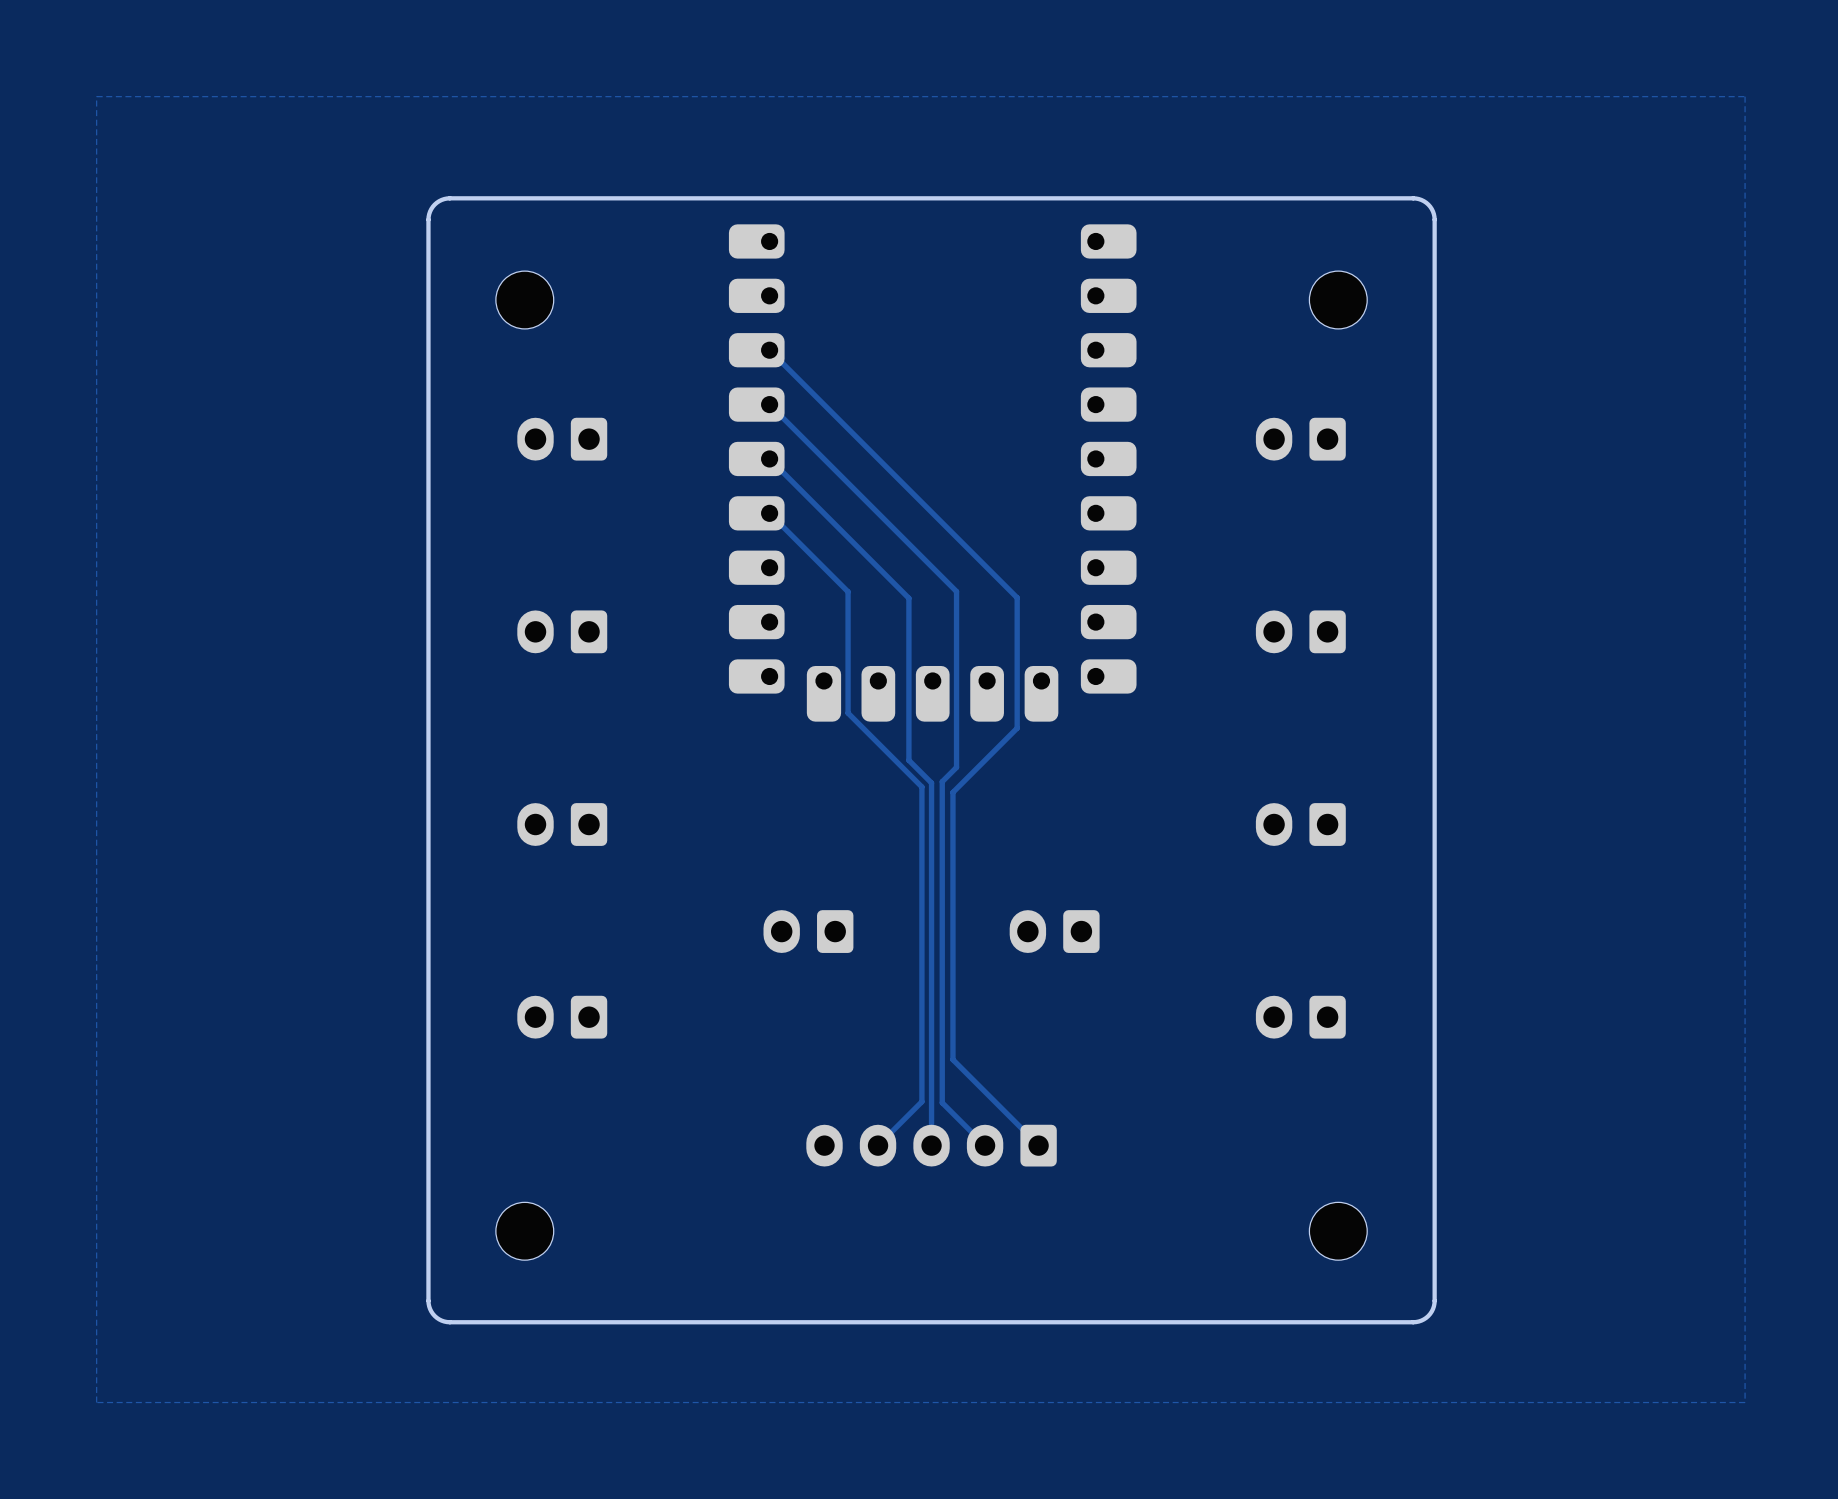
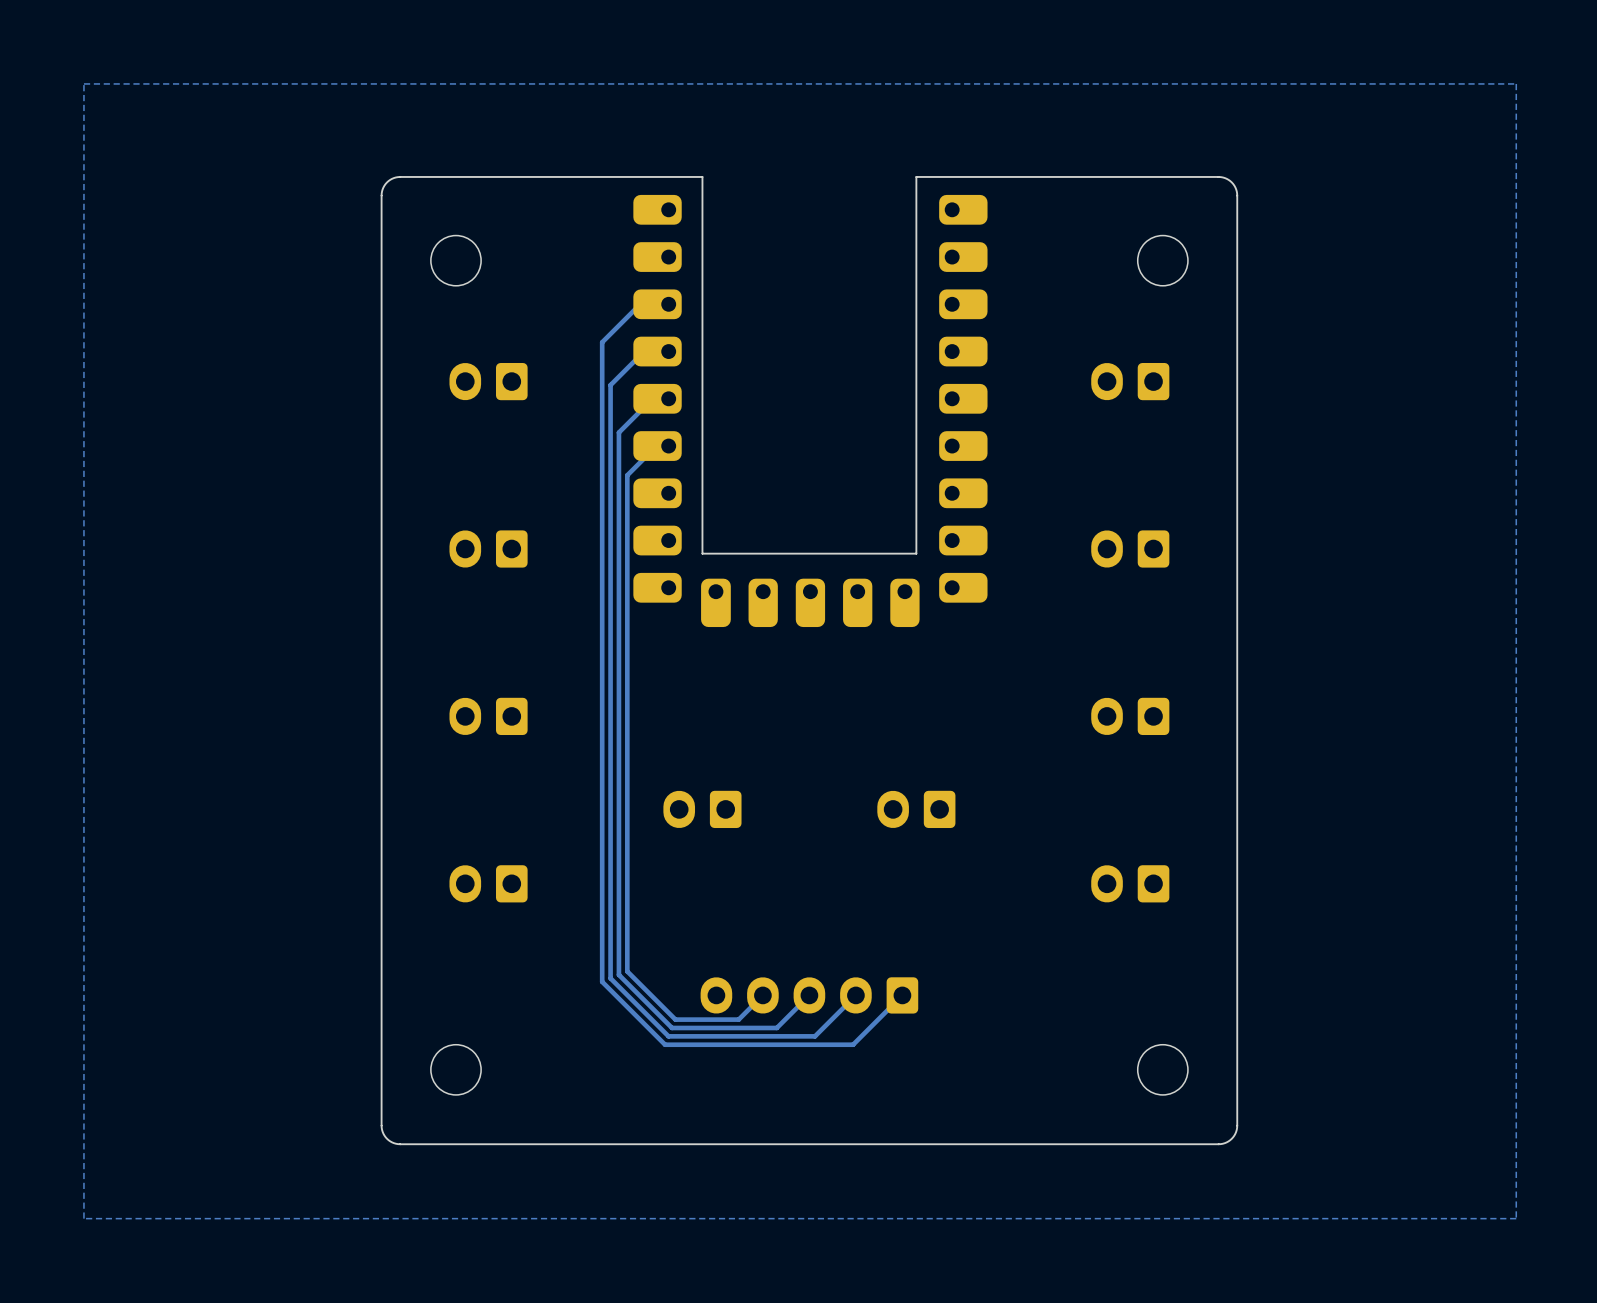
board edge: (1413, 198) (449, 198) (439, 201) (432, 206) (428, 219) (428, 1300) (430, 1309) (436, 1317) (449, 1322) (1413, 1322) (1421, 1320) (1430, 1313) (1434, 1300) (1434, 219) (1433, 211) (1428, 204) (1421, 199) (1413, 198) -> (1218, 176) (1231, 182) (1237, 195) (1237, 1125) (1233, 1137) (1226, 1142) (1218, 1144) (400, 1144) (388, 1140) (383, 1133) (381, 1125) (381, 195) (385, 183) (392, 178) (400, 176) (702, 176) (702, 553) (916, 553) (916, 176) (1218, 176)
track: (769, 350) (1017, 597) (1017, 728) (952, 792) (952, 1059) (1038, 1145) -> (668, 304) (640, 304) (602, 342) (602, 981) (665, 1044) (853, 1044) (902, 995)
track: (769, 404) (956, 591) (956, 767) (942, 781) (942, 1102) (985, 1145) -> (668, 351) (644, 351) (610, 385) (610, 978) (668, 1036) (814, 1036) (855, 995)
track: (769, 458) (908, 598) (908, 760) (931, 782) (931, 1145) -> (668, 398) (652, 398) (618, 432) (618, 974) (672, 1027) (776, 1027) (809, 995)
track: (769, 513) (848, 591) (848, 713) (921, 786) (921, 1101) (878, 1145) -> (668, 446) (656, 446) (627, 475) (627, 971) (675, 1019) (738, 1019) (762, 995)

